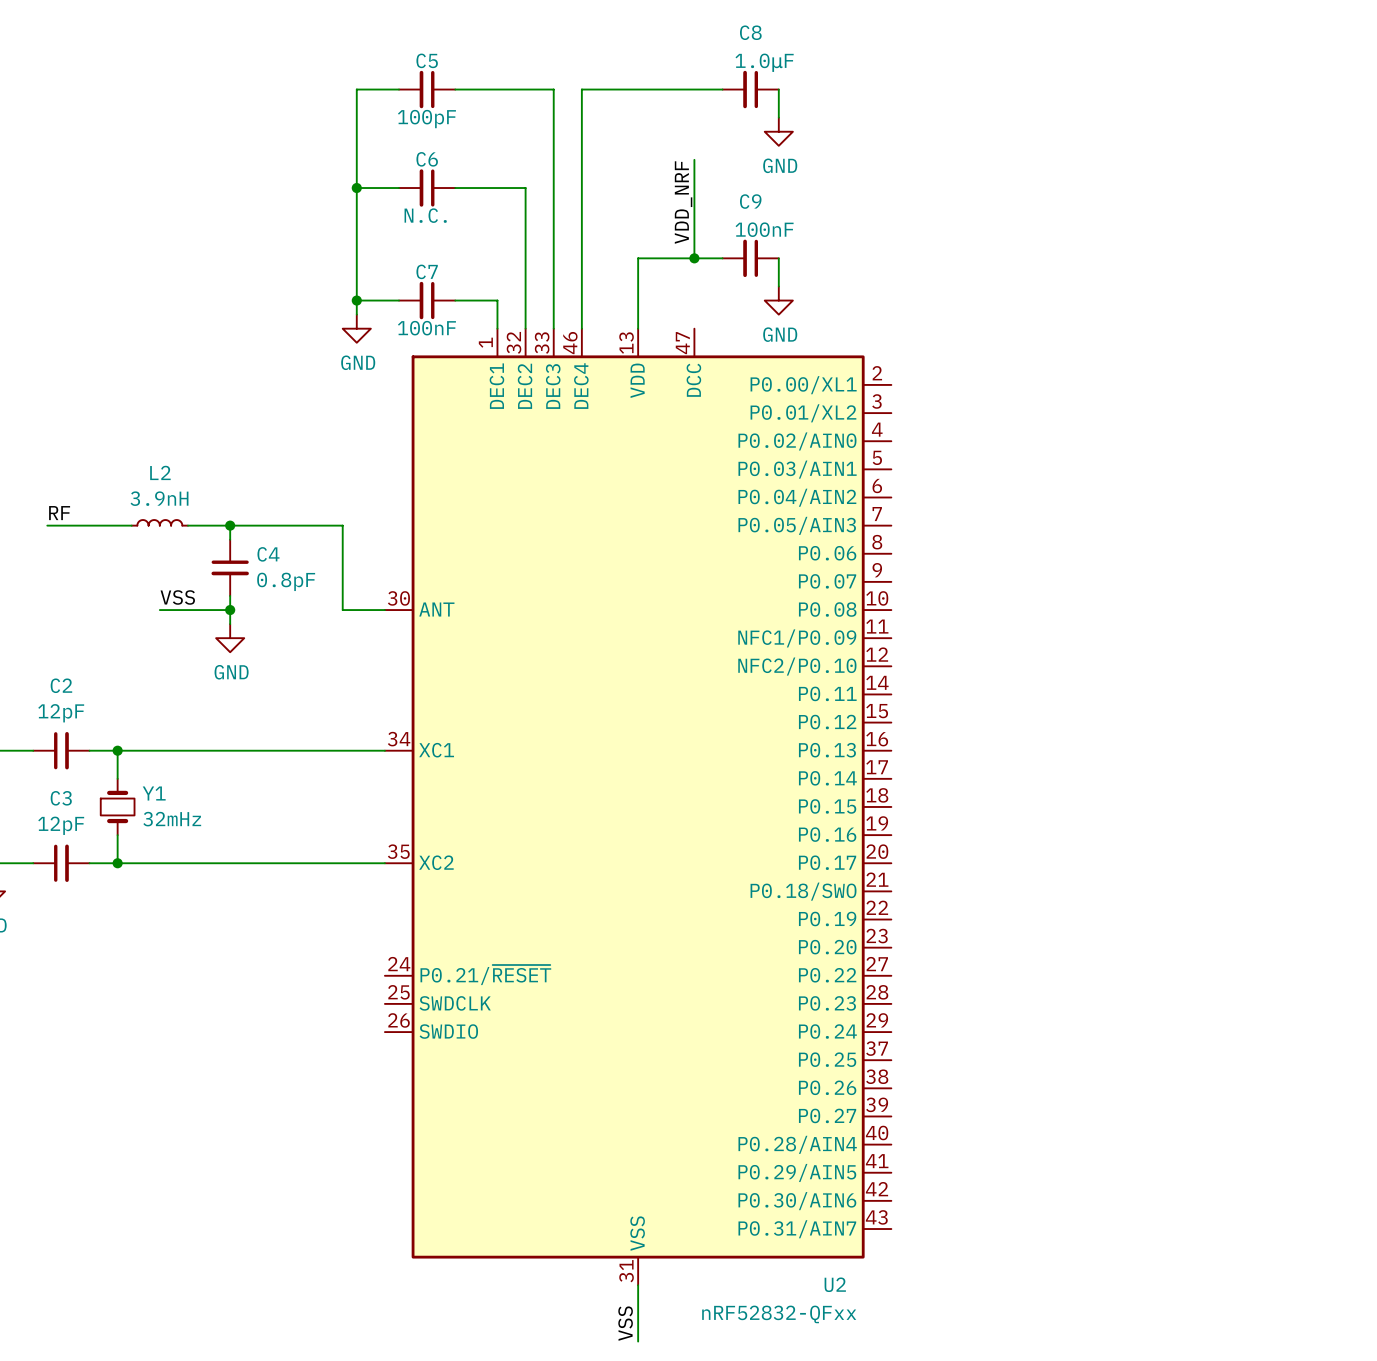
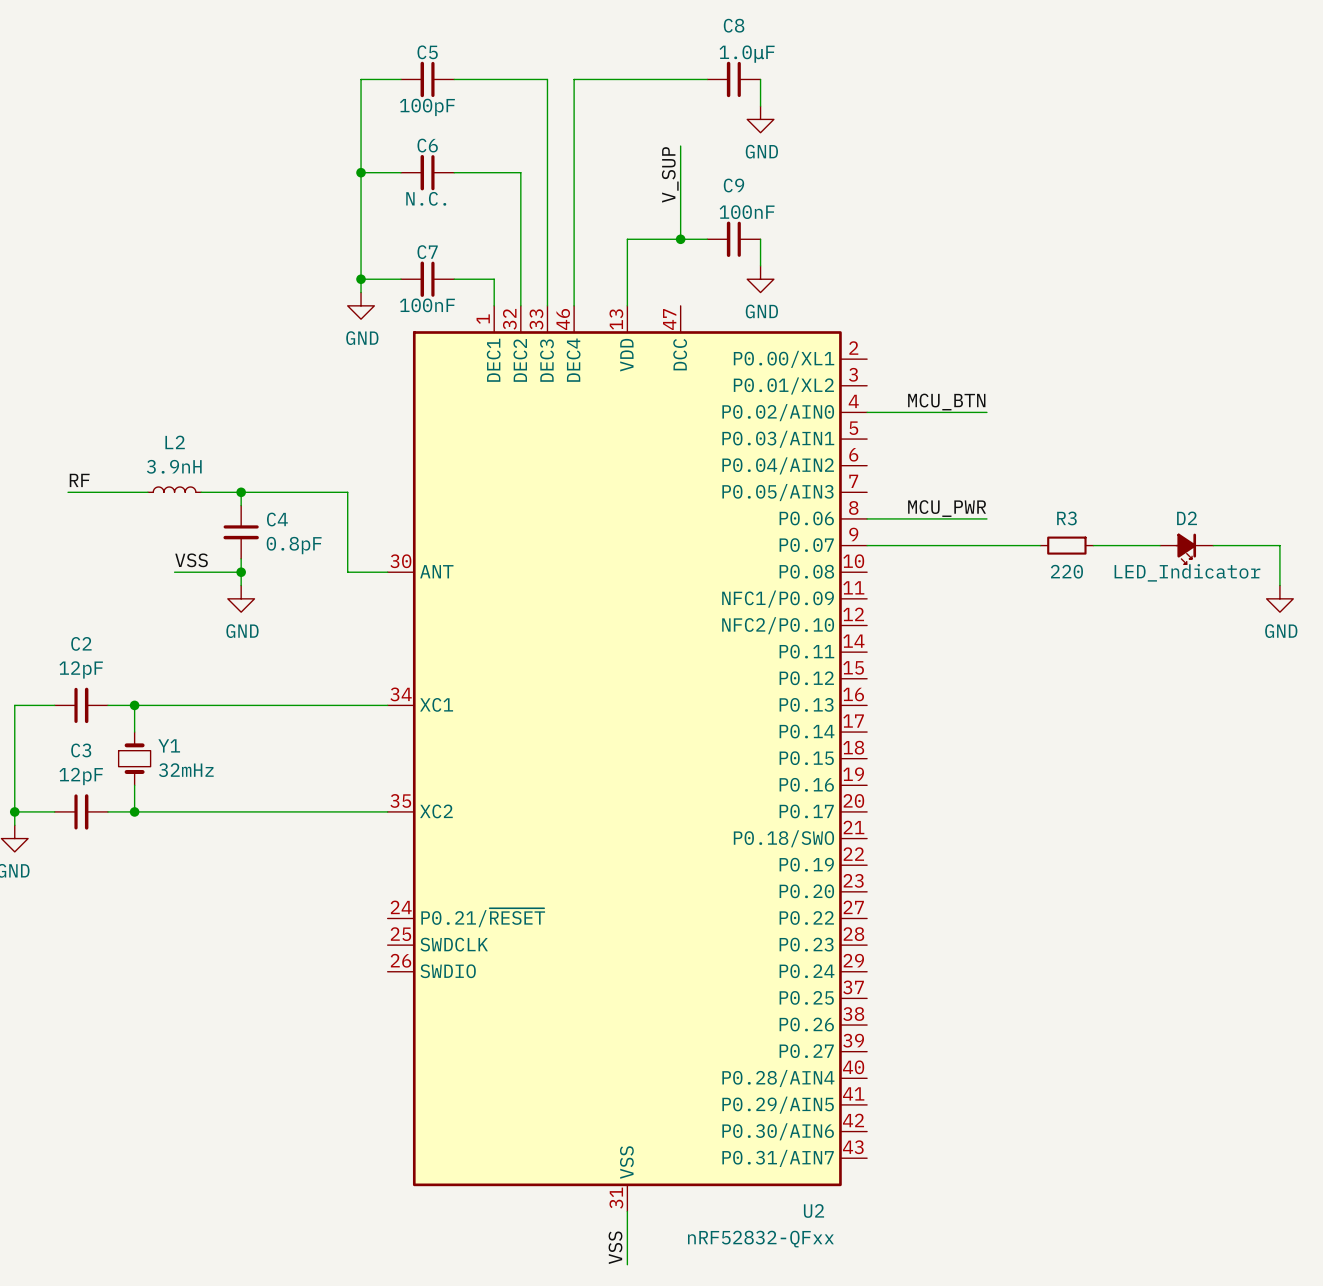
label: VDD_NRF (683, 202) -> V_SUP (670, 174)
label: none -> MCU_BTN (946, 402)
wire: none -> (867, 412) (986, 412)
label: none -> MCU_PWR (947, 508)
wire: none -> (867, 518) (986, 518)
wire: none -> (867, 545) (1040, 545)
R3: none -> 220 (1066, 545)
wire: none -> (1093, 545) (1160, 545)
wire: none -> (1213, 545) (1279, 545) (1279, 585)
D2: none -> LED_Indicator (1186, 548)
power symbol: none -> GND (1279, 598)

